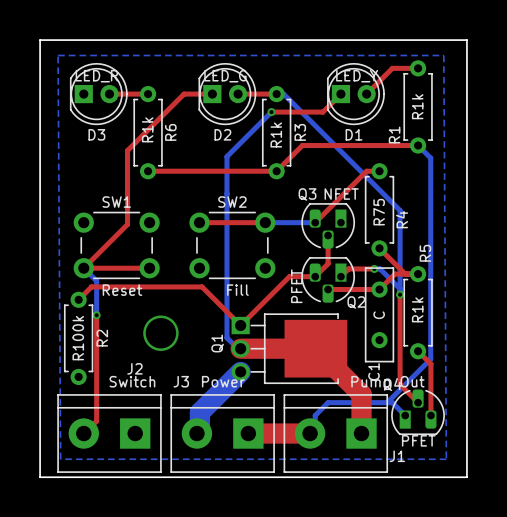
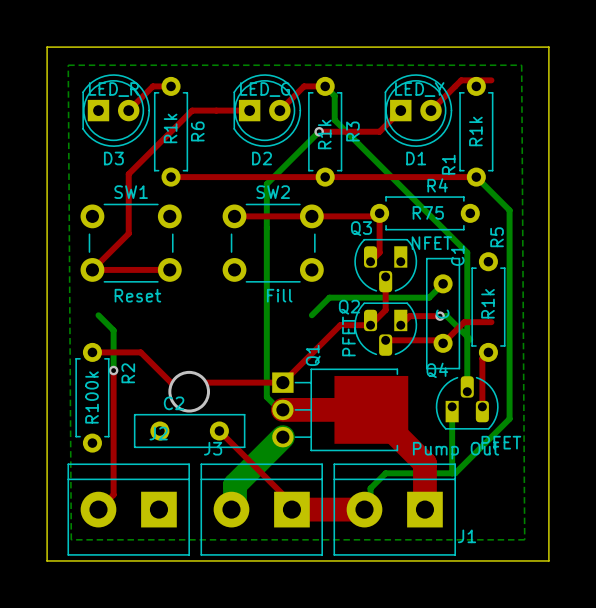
bottom track: none -> (325, 86) (334, 95) (334, 120) (467, 252) (467, 391)
top track: (109, 94) (148, 94) -> (128, 110) (152, 86) (171, 86)
top track: (184, 94) (127, 150) (127, 224) (83, 268) -> (216, 110) (192, 110) (128, 174) (128, 233) (92, 269) (169, 269)
top track: (238, 94) (276, 94) -> (279, 110) (304, 86) (325, 86)
bottom track: (276, 94) (283, 94) (400, 210) (400, 294) -> none
R1 position: (418, 106) -> (476, 131)
R6 position: (148, 132) -> (171, 131)
R3 position: (276, 132) -> (325, 131)
top track: (418, 145) (302, 145) (276, 171) (148, 171) -> none
bottom track: (418, 145) (430, 158) (430, 359) -> (476, 177) (509, 210) (509, 418) (506, 422)
top track: none -> (171, 177) (476, 177)
top track: (379, 171) (366, 171) (322, 214) -> (234, 216) (376, 216) (379, 213) (379, 252)
Q3 value position: NFET (341, 194) -> NFET (431, 243)
R4 rotation: 0° (379, 209) -> 90° clockwise (424, 213)
R4 name position: R4 (402, 219) -> R4 (437, 185)
top track: (199, 222) (265, 222) -> none
bottom track: (265, 222) (315, 222) -> none
bottom track: none -> (443, 283) (429, 297) (329, 297) (311, 315)
SW1 position: (116, 245) -> (131, 243)
SW2 position: (232, 245) -> (273, 243)
top track: (379, 248) (405, 274) -> none
top track: (83, 268) (149, 268) -> none
top track: (400, 294) (400, 384) (418, 402) -> none
via: (400, 294) -> none
top track: (78, 299) (91, 286) (202, 286) (240, 325) -> (92, 352) (140, 352) (171, 382) (282, 382)
top track: none -> (488, 352) (482, 358) (482, 406) (485, 406)
Q2 name position: Q2 (356, 302) -> Q2 (349, 307)
R5 position: (418, 312) -> (488, 307)
C1 position: (379, 314) -> (443, 313)
R2 name position: R2 (102, 338) -> R2 (128, 373)
Q1 name position: Q1 (217, 343) -> Q1 (313, 355)
bottom track: none -> (452, 406) (452, 473)
top track: (418, 351) (430, 364) (430, 415) -> none
C2: none -> (189, 431)
top track: none -> (219, 431) (291, 503) (291, 509)
C1 name position: C1 (373, 371) -> C1 (457, 255)
J2 value: Switch (132, 381) -> none
J3 value: Power (223, 381) -> none
bottom track: (387, 402) (392, 402) (405, 415) -> none
Q4 position: (418, 412) -> (467, 402)
Q4 value position: PFET (418, 440) -> PFET (501, 442)

